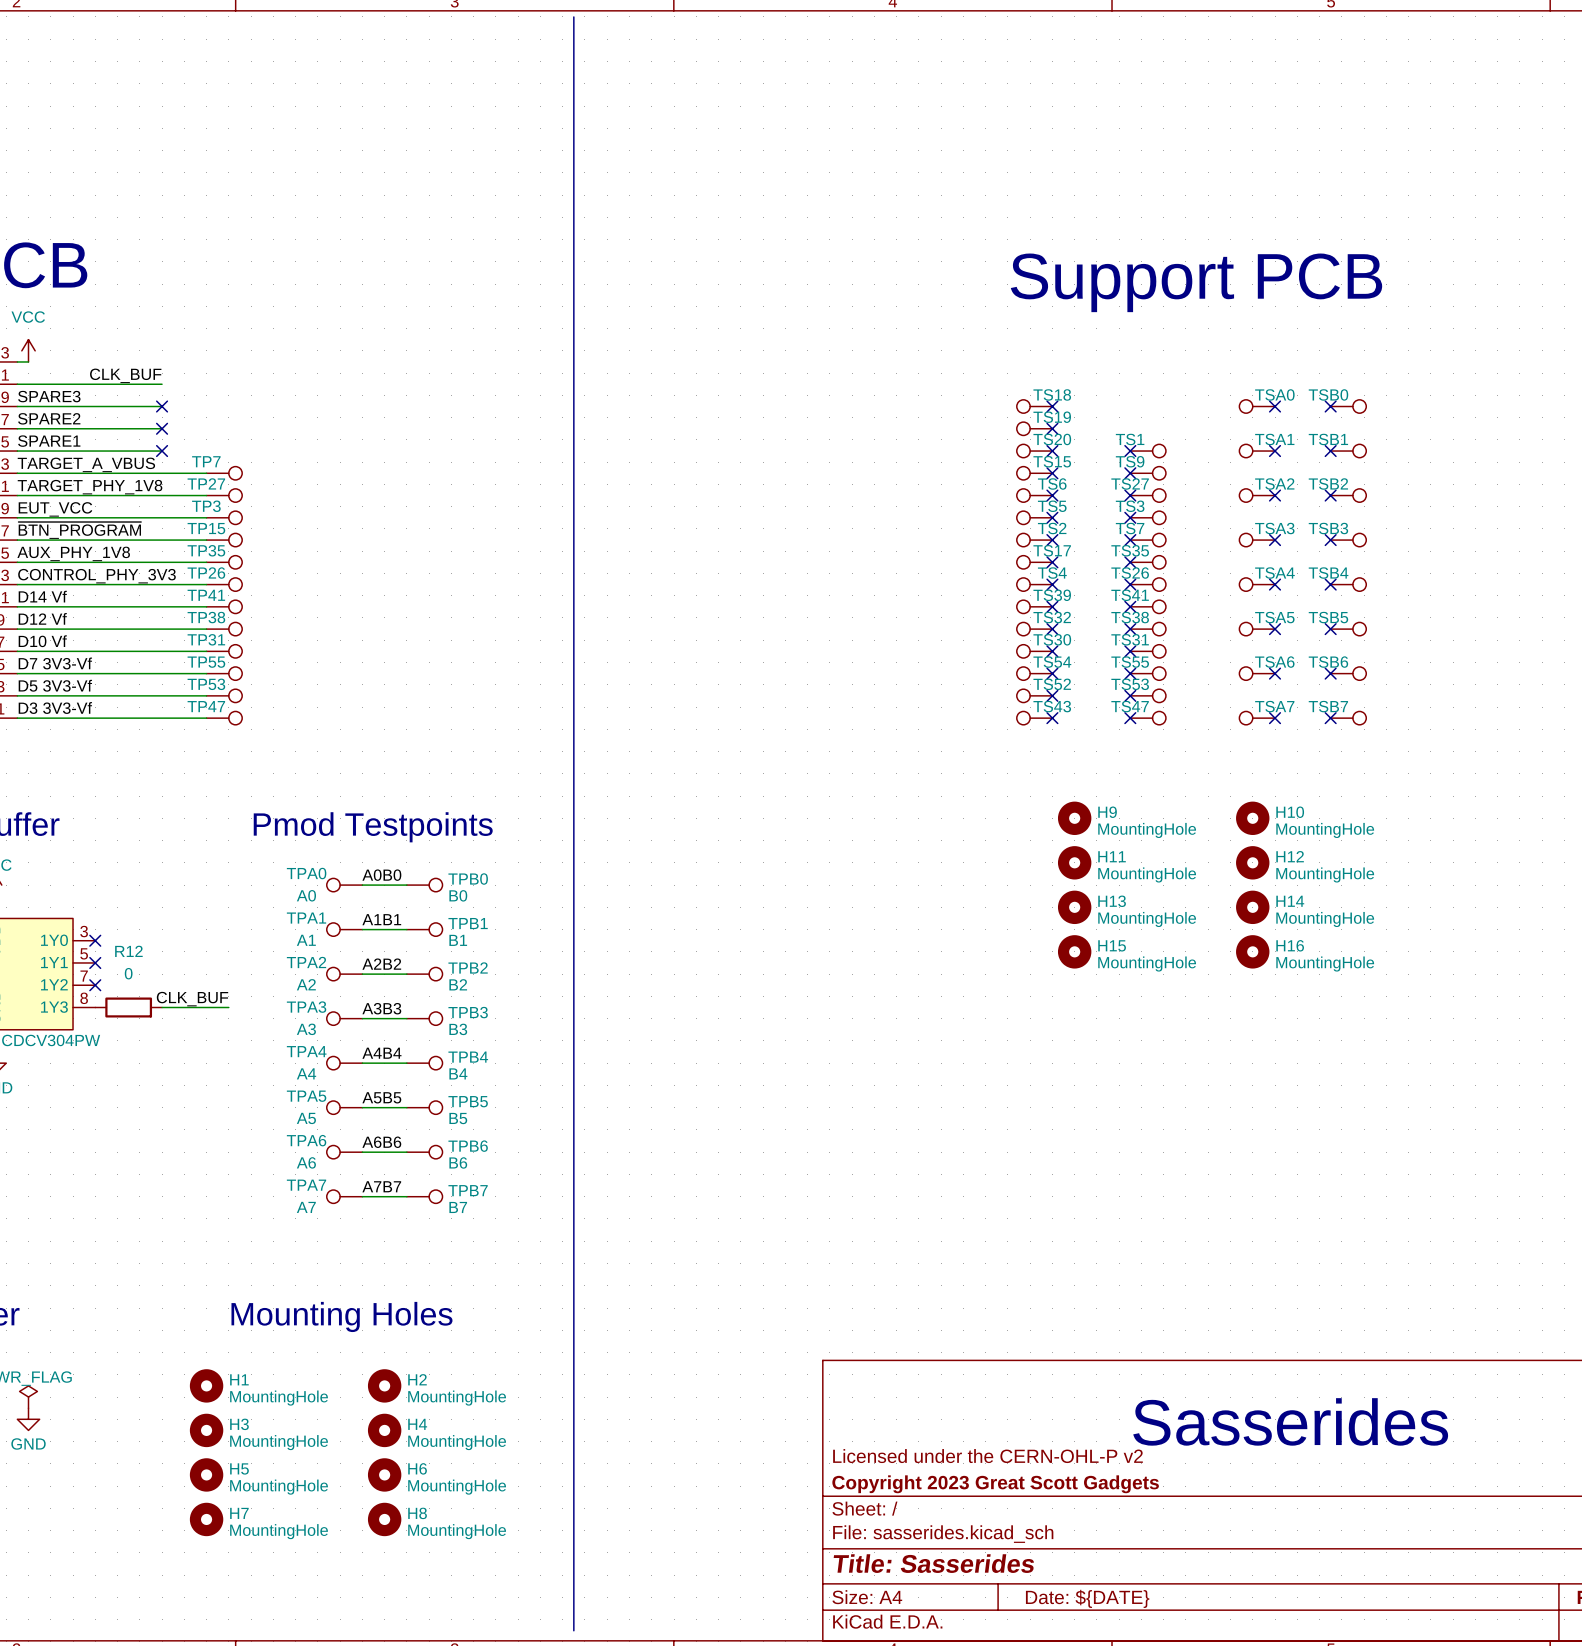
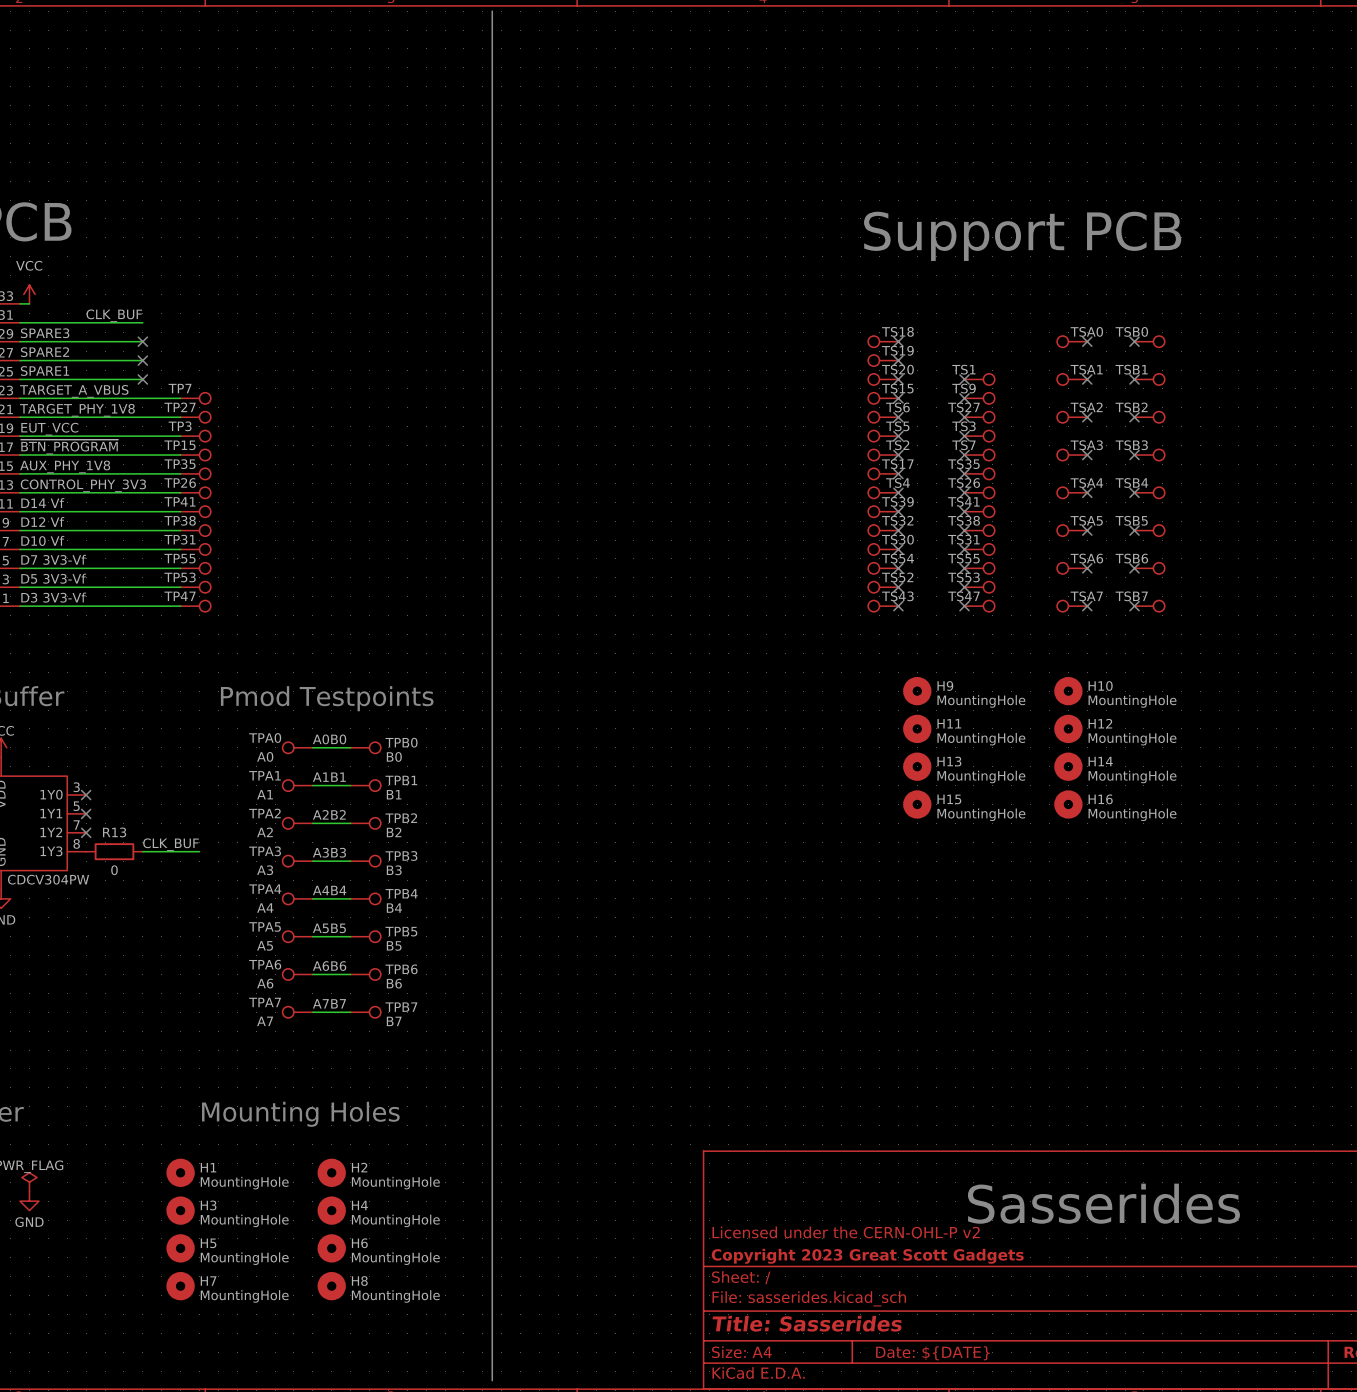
R12 name: R12 (128, 951) -> R13 (114, 832)
R12 value position: 0 (128, 973) -> 0 (114, 870)

